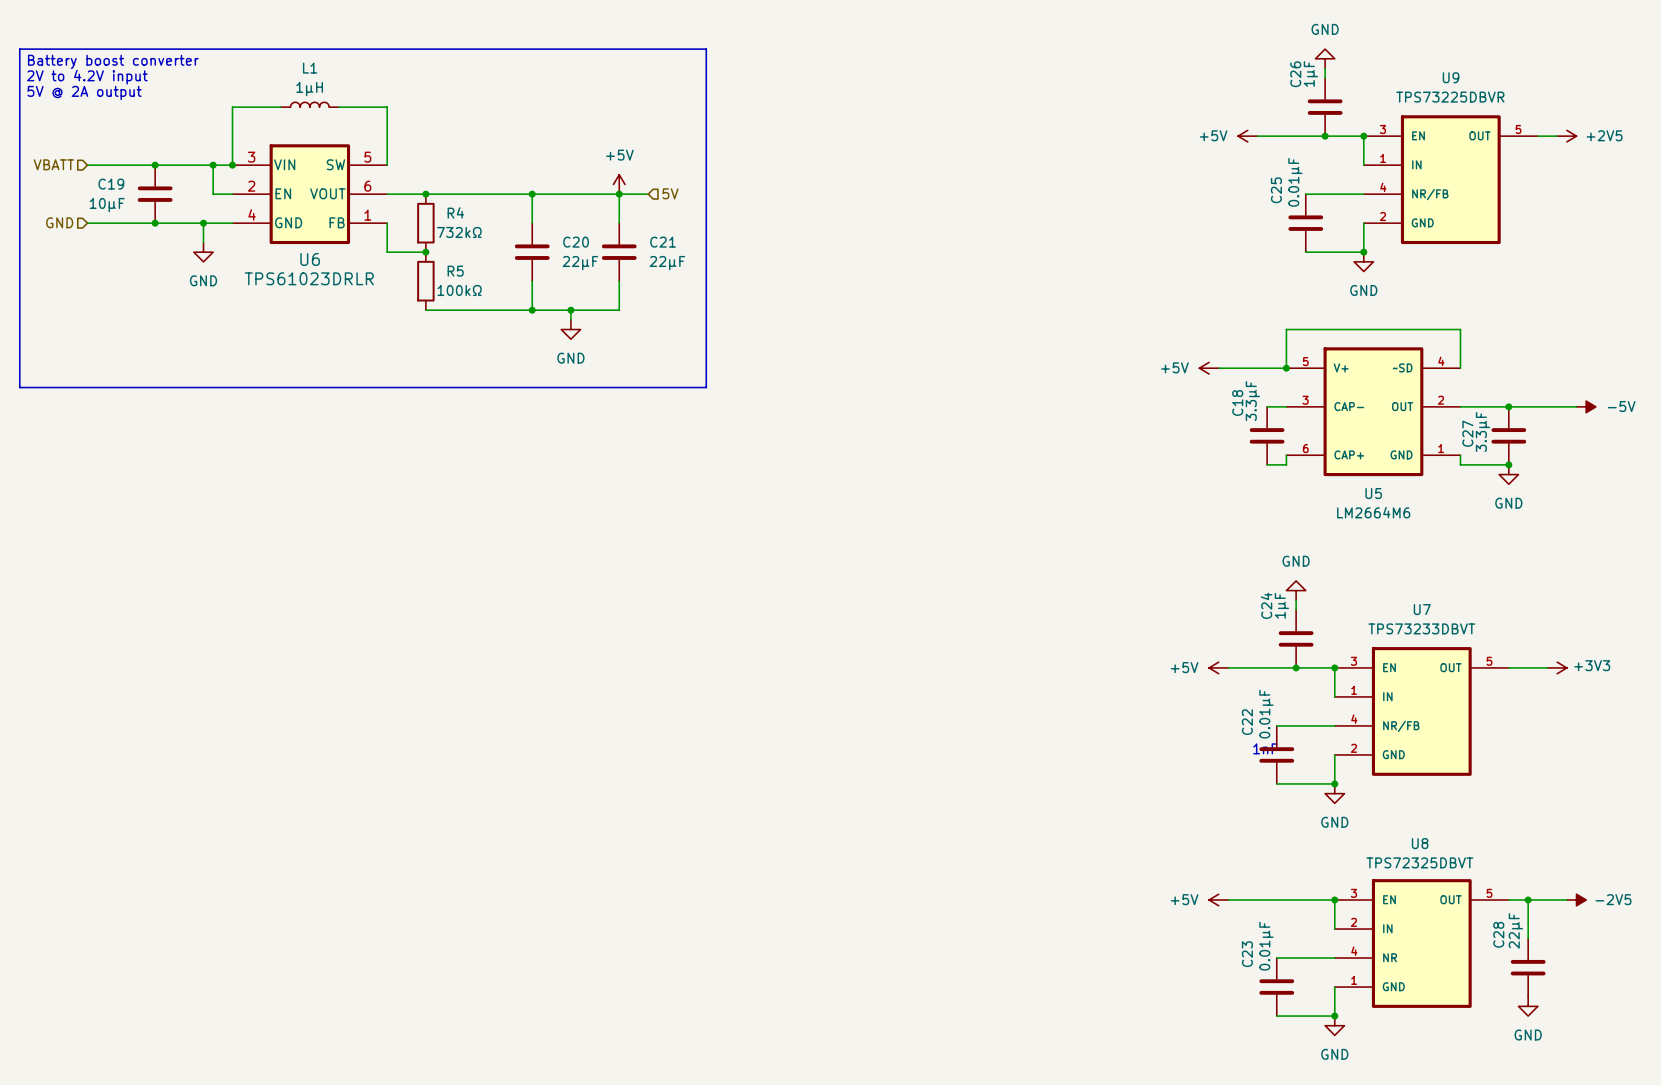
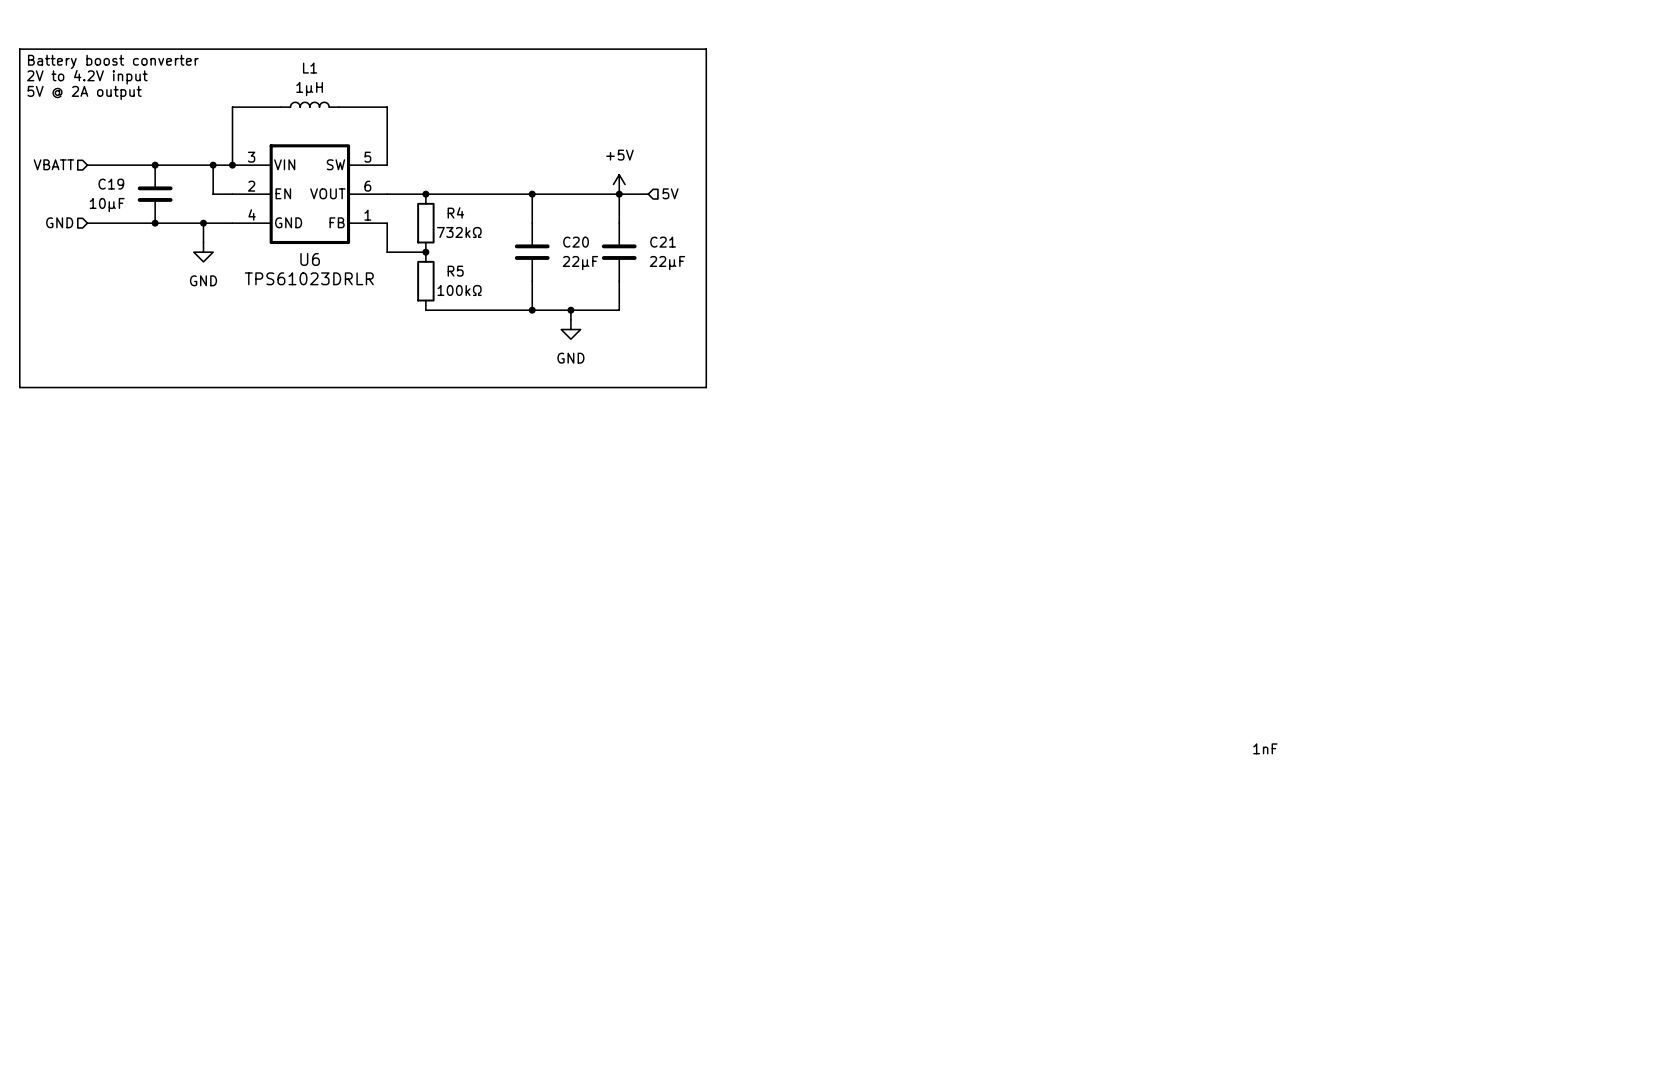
power symbol: GND (1325, 58) -> none
wire: (1325, 68) (1325, 78) -> none
C26: 1µF (1325, 107) -> none
power symbol: +5V (1247, 136) -> none
wire: (1257, 136) (1363, 136) (1363, 165) -> none
junction: (1325, 136) -> none
junction: (1363, 136) -> none
wire: (1537, 136) (1557, 136) -> none
power symbol: +2V5 (1566, 136) -> none
U9: TPS73225DBVR (1450, 179) -> none
wire: (1305, 194) (1363, 194) -> none
C25: 0.01µF (1305, 223) -> none
wire: (1363, 223) (1363, 252) (1305, 252) -> none
junction: (1363, 252) -> none
power symbol: GND (1363, 261) -> none
power symbol: +5V (1209, 368) -> none
wire: (1218, 368) (1286, 368) (1286, 329) (1460, 329) (1460, 368) -> none
junction: (1286, 368) -> none
wire: (1267, 406) (1286, 406) -> none
wire: (1460, 406) (1576, 406) -> none
junction: (1508, 406) -> none
power symbol: -5V (1586, 406) -> none
U5: LM2664M6 (1373, 411) -> none
C18: 3.3µF (1267, 435) -> none
C27: 3.3µF (1508, 435) -> none
wire: (1286, 455) (1286, 464) (1267, 464) -> none
wire: (1460, 455) (1460, 464) (1508, 464) -> none
junction: (1508, 464) -> none
power symbol: GND (1508, 474) -> none
power symbol: GND (1296, 590) -> none
wire: (1296, 600) (1296, 609) -> none
C24: 1µF (1296, 638) -> none
power symbol: +5V (1218, 667) -> none
wire: (1228, 667) (1334, 667) (1334, 696) -> none
junction: (1296, 667) -> none
junction: (1334, 667) -> none
wire: (1508, 667) (1547, 667) -> none
power symbol: +3V3 (1557, 667) -> none
U7: TPS73233DBVT (1421, 711) -> none
wire: (1276, 725) (1334, 725) -> none
C22: 0.01µF (1276, 754) -> none
wire: (1334, 754) (1334, 783) (1276, 783) -> none
junction: (1334, 783) -> none
power symbol: GND (1334, 793) -> none
power symbol: +5V (1218, 900) -> none
wire: (1228, 900) (1334, 900) (1334, 929) -> none
junction: (1334, 900) -> none
wire: (1508, 900) (1566, 900) -> none
wire: (1528, 900) (1528, 938) -> none
junction: (1528, 900) -> none
power symbol: -2V5 (1576, 900) -> none
U8: TPS72325DBVT (1421, 943) -> none
wire: (1276, 958) (1334, 958) -> none
C28: 22µF (1528, 967) -> none
C23: 0.01µF (1276, 987) -> none
wire: (1334, 987) (1334, 1016) (1276, 1016) -> none
power symbol: GND (1528, 1006) -> none
junction: (1334, 1016) -> none
power symbol: GND (1334, 1025) -> none

